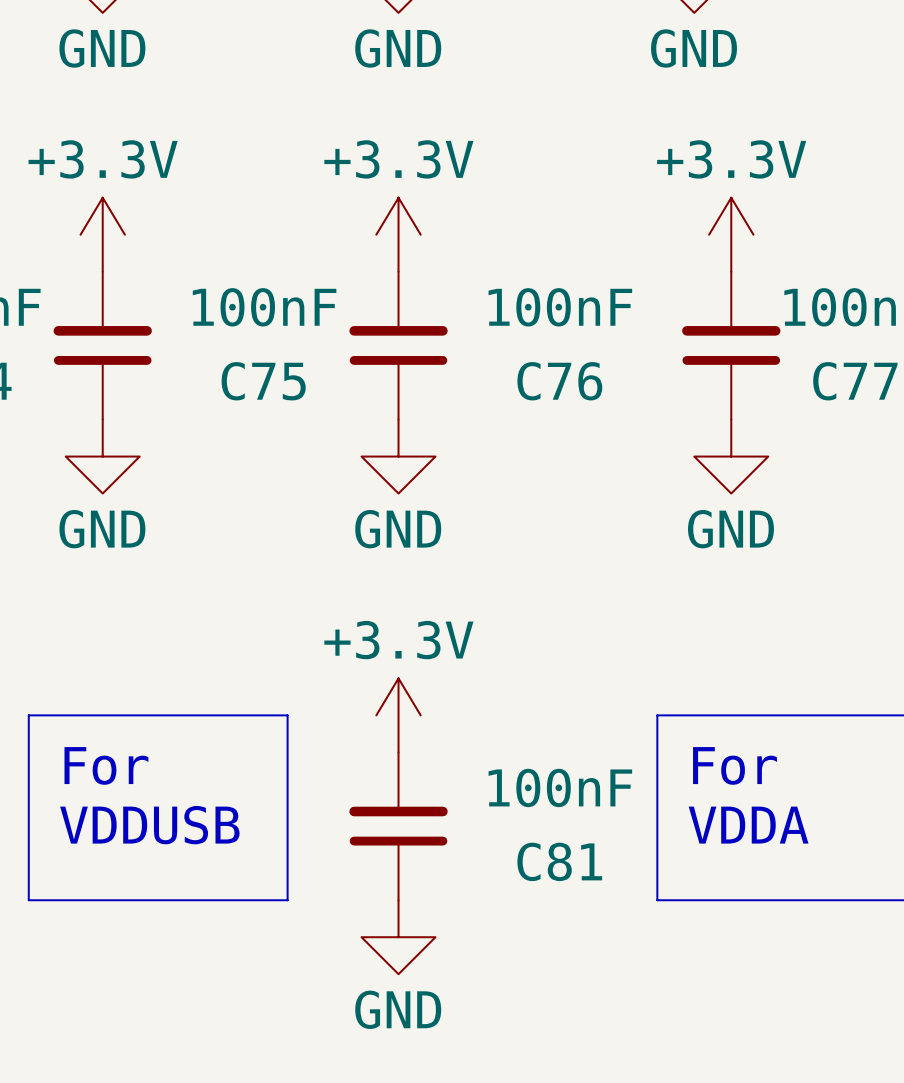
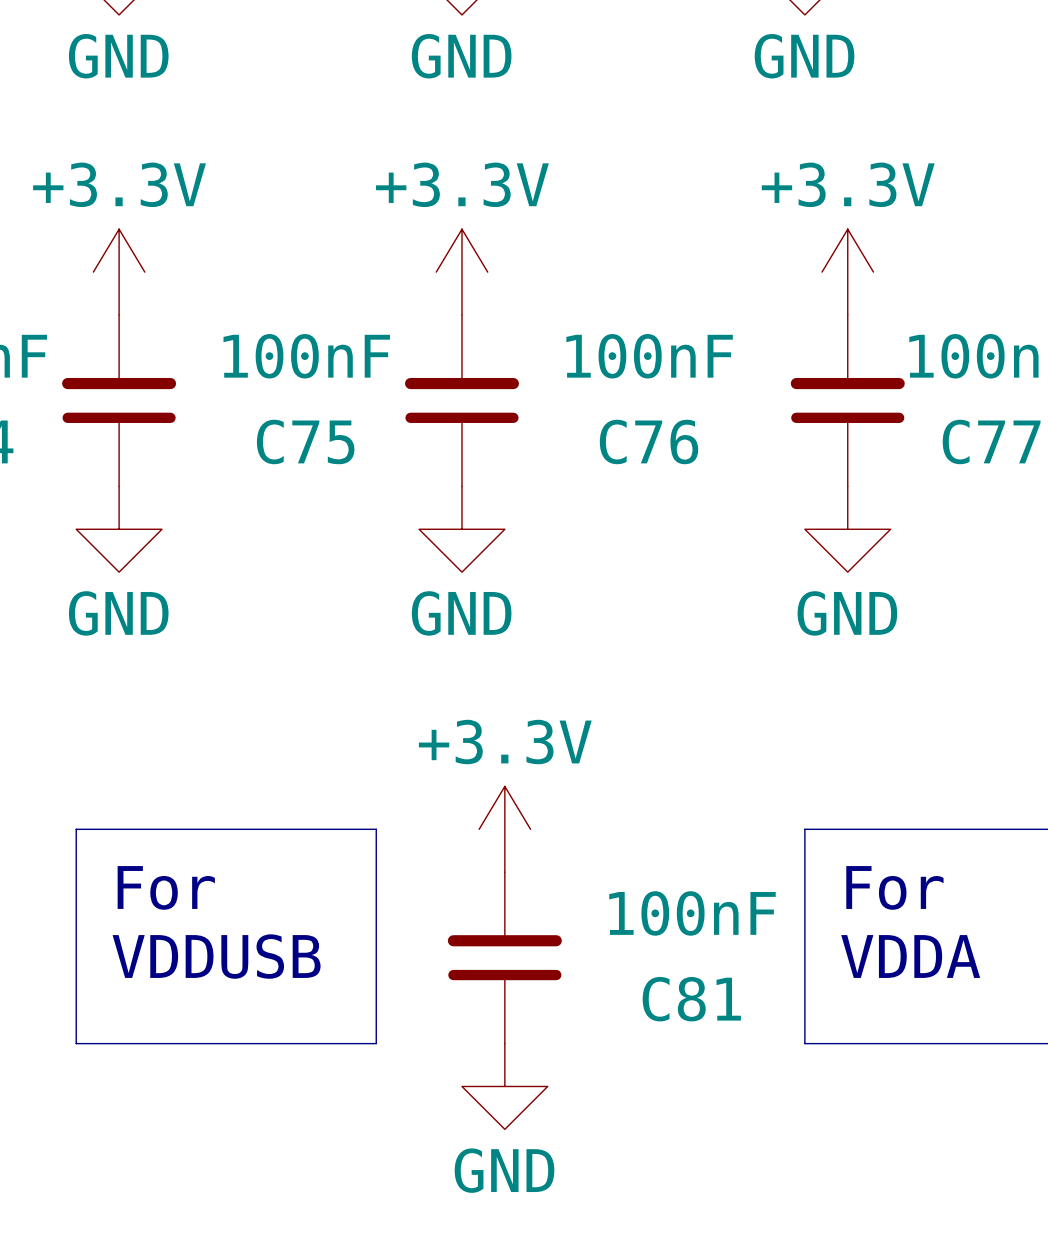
line: (65, 715) (28, 715) (28, 900) (65, 900) -> (76, 829) (76, 1043)
line: (287, 715) (287, 900) -> (333, 829) (376, 829) (376, 1043) (333, 1043)
power symbol position: +3.3V (398, 715) -> +3.3V (504, 829)
line: (694, 715) (657, 715) (657, 900) (694, 900) -> (804, 829) (804, 1043)
text position: For (106, 765) -> For (166, 887)
text position: For (735, 765) -> For (894, 887)
text position: VDDUSB (149, 825) -> VDDUSB (216, 956)
text position: VDDA (748, 825) -> VDDA (910, 956)
C81 position: (398, 826) -> (504, 957)
power symbol position: GND (398, 937) -> GND (504, 1086)

